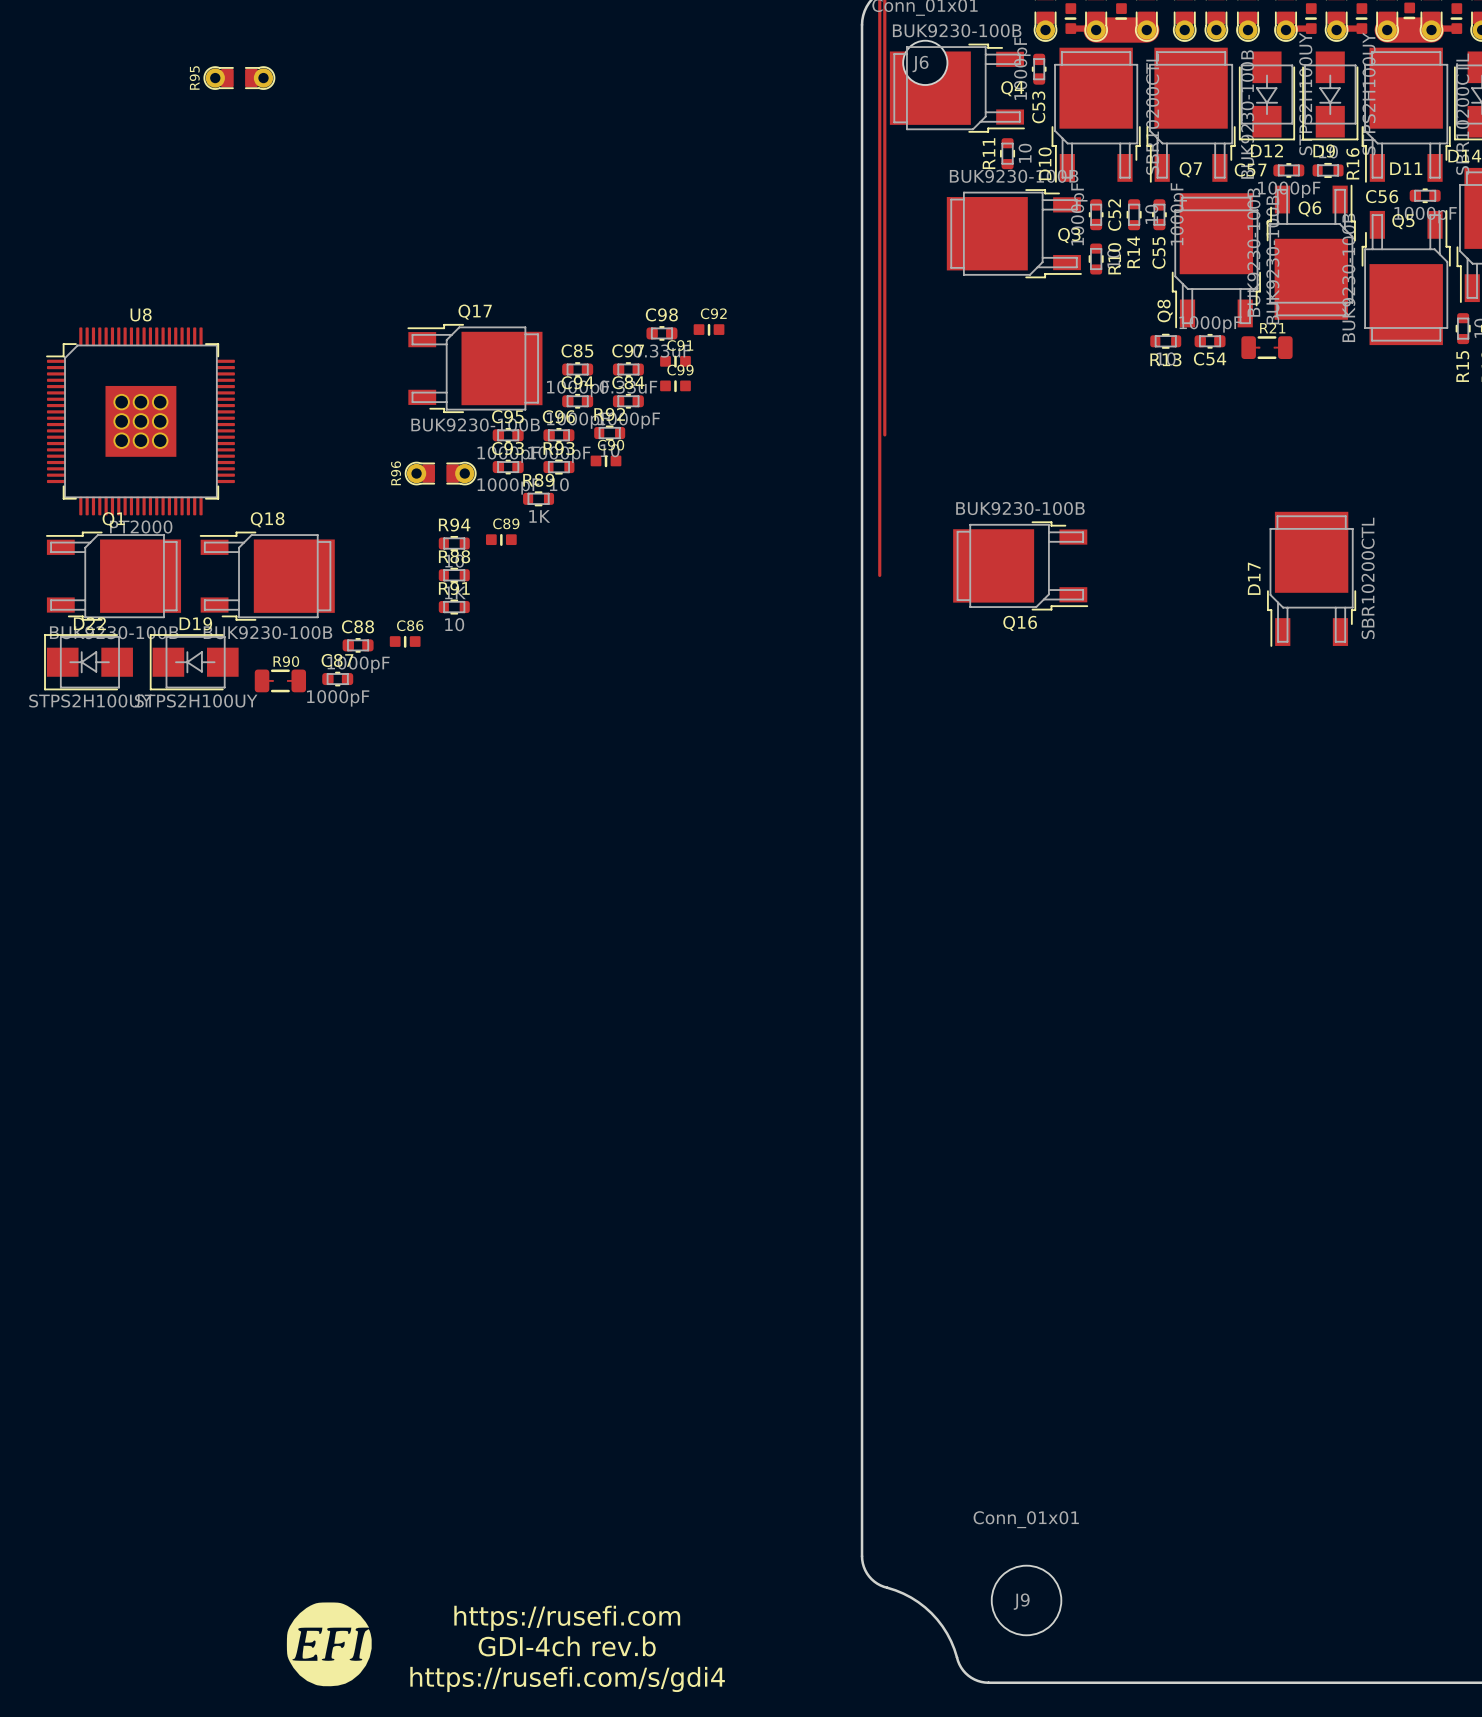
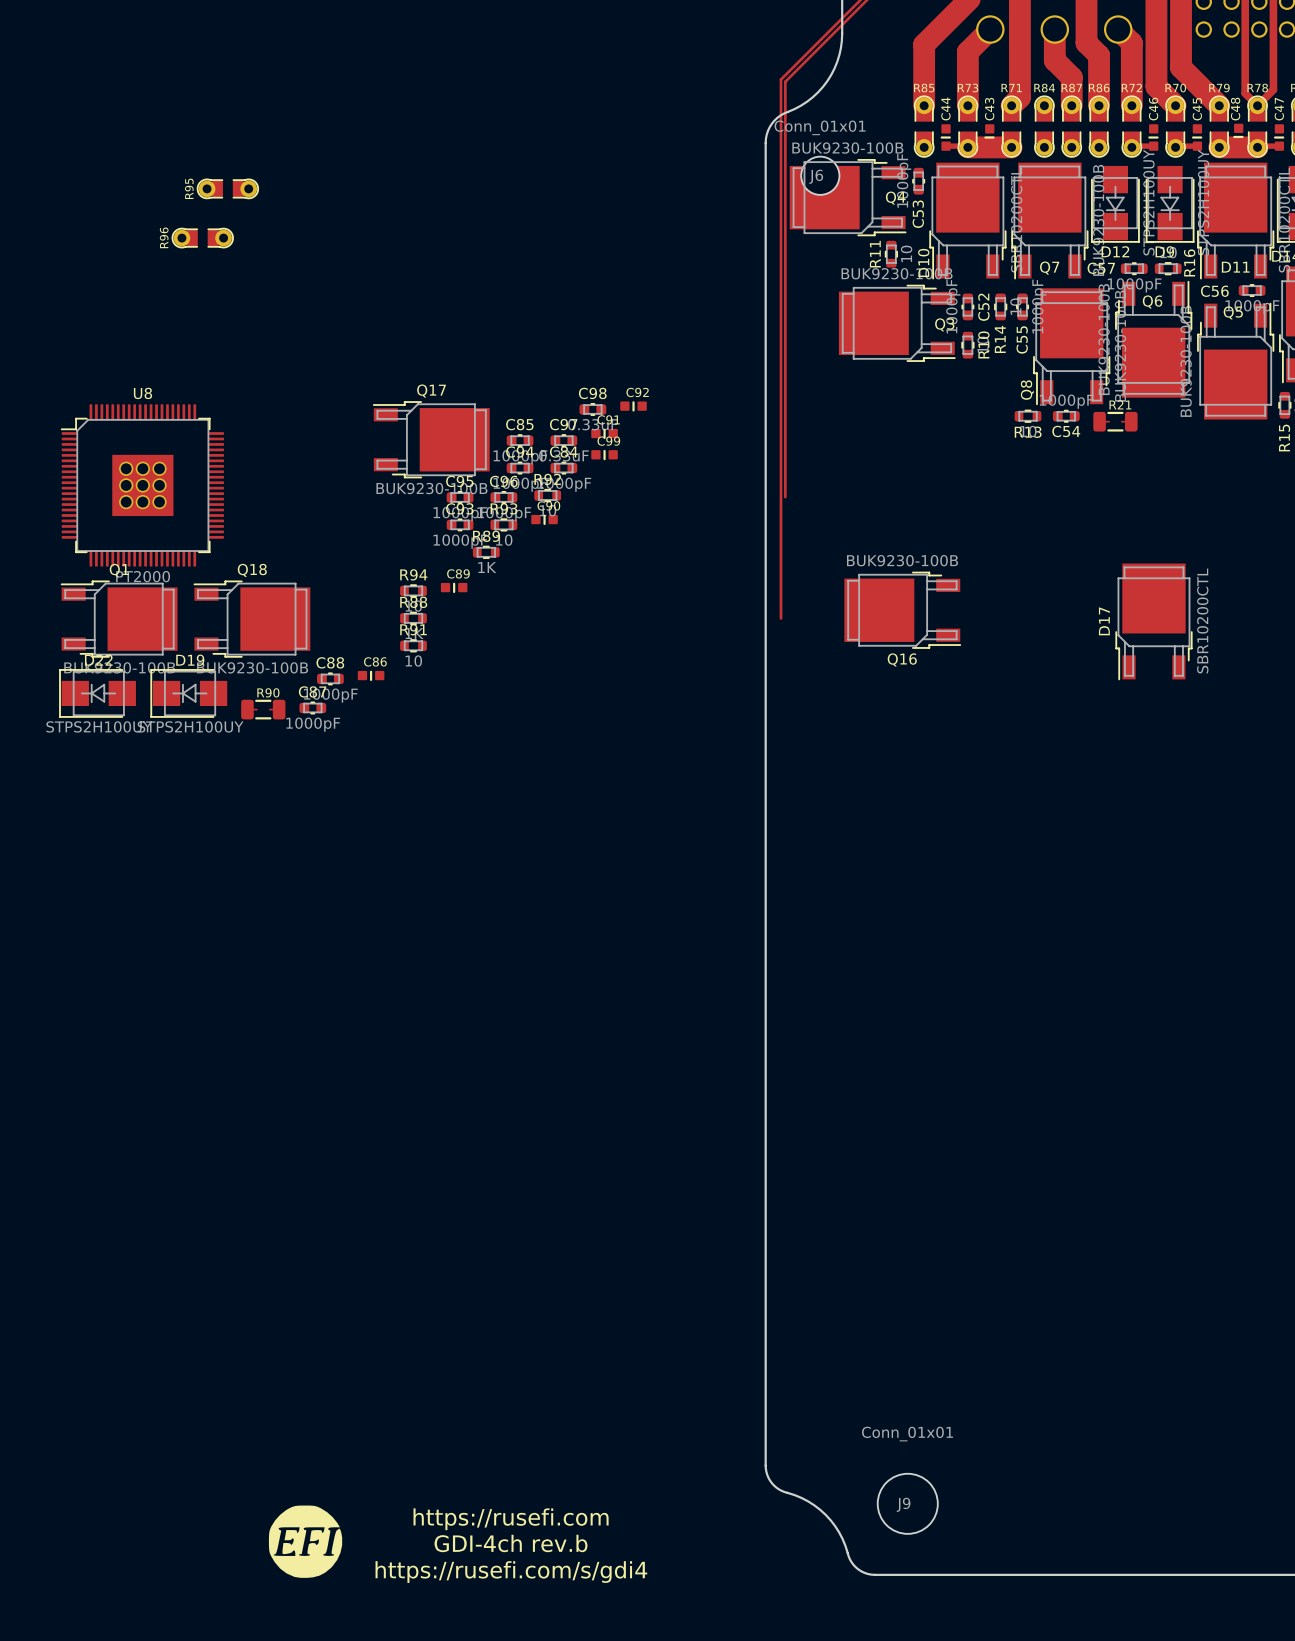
R96 position: (440, 473) -> (202, 238)

